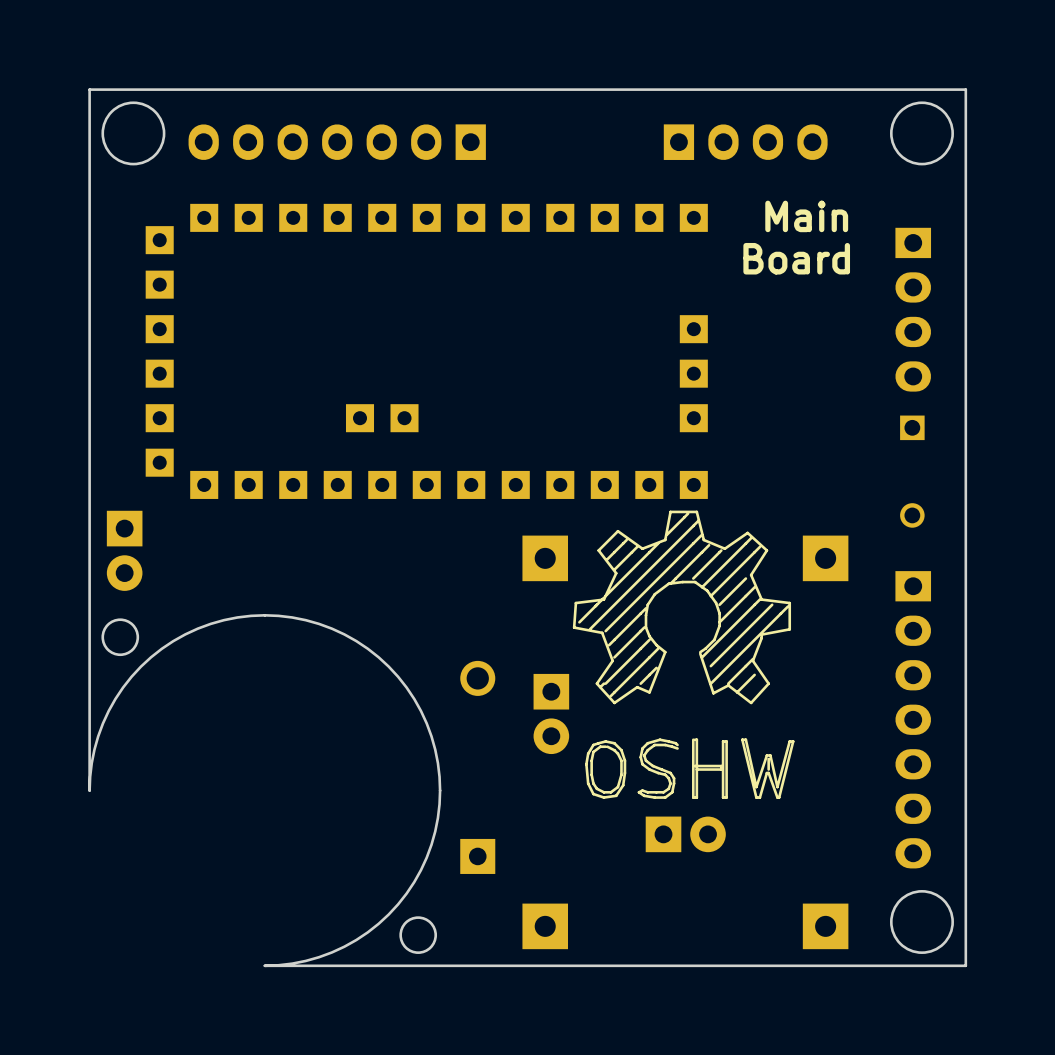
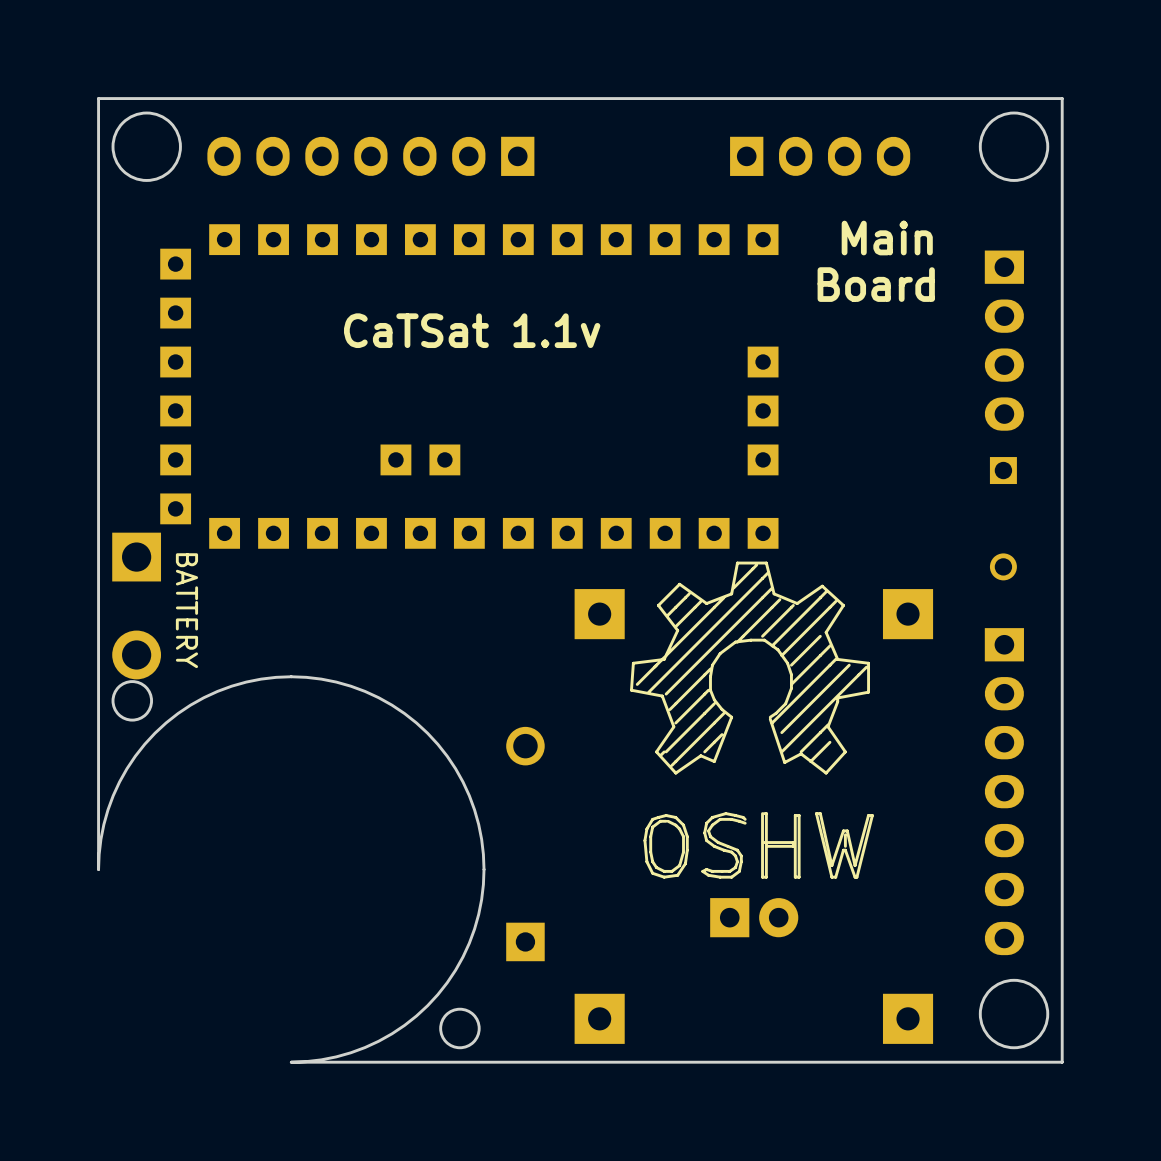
text: none -> CaTSat 1.1v (472, 330)
part footprint: [106, 510, 143, 591] -> [112, 532, 162, 680]
part value: none -> BATTERY (186, 610)
part: (551, 713) -> none

